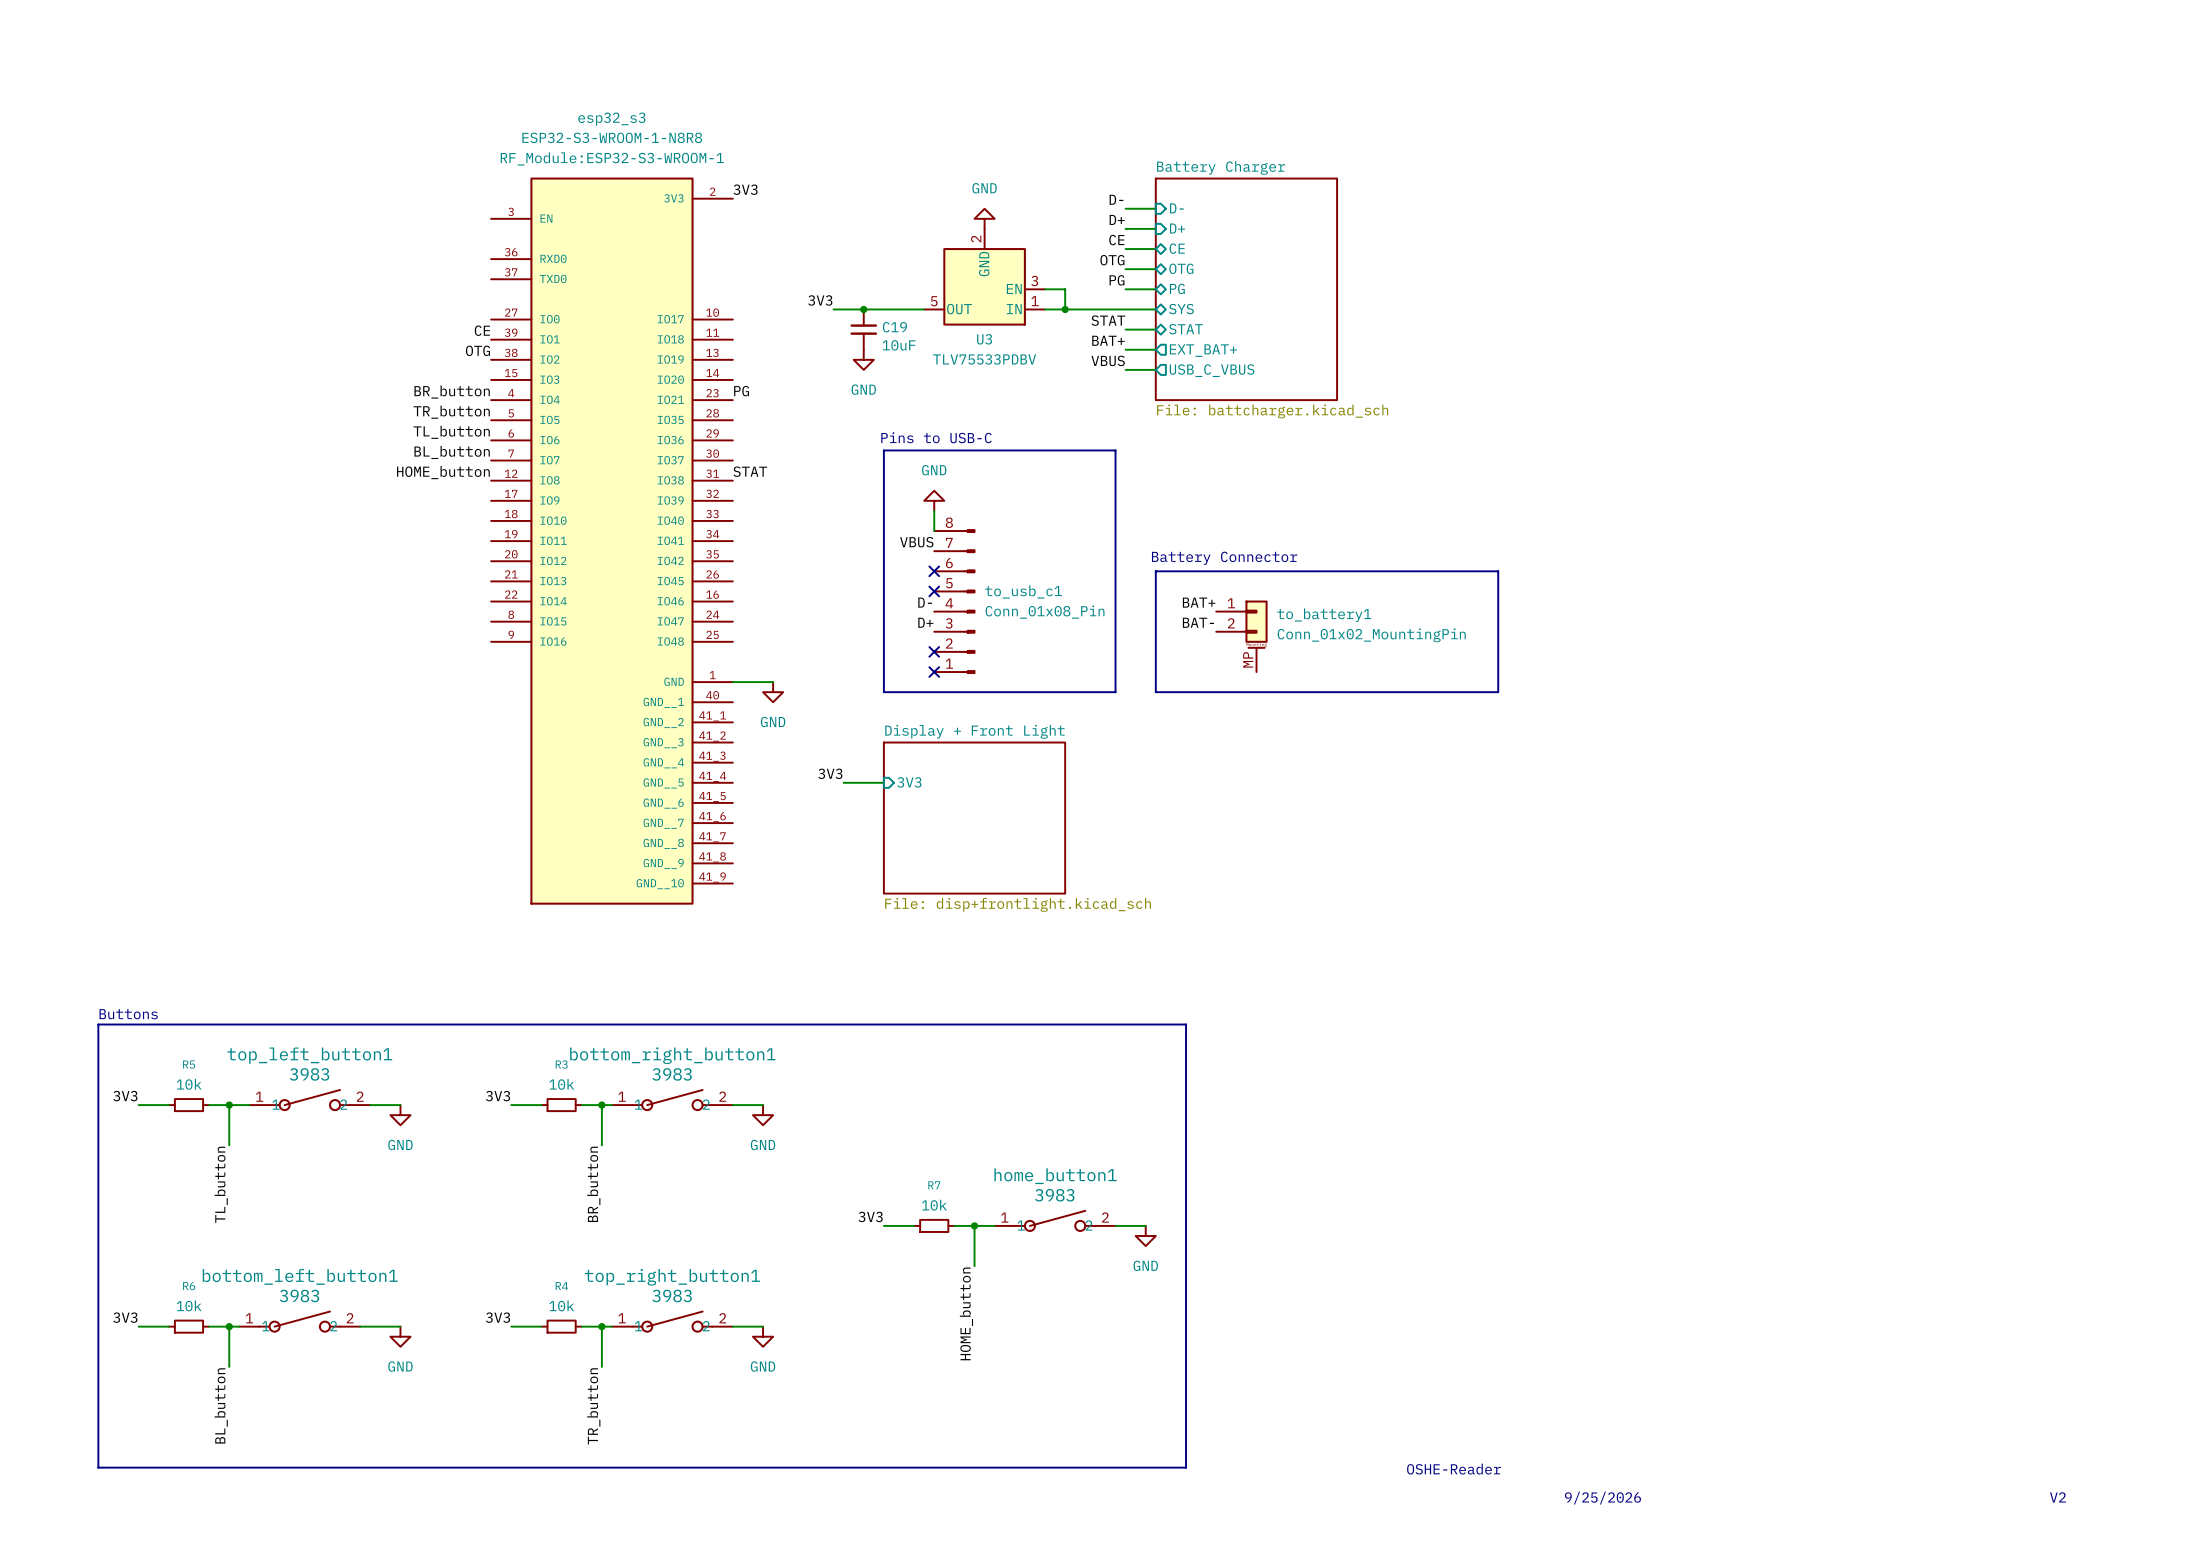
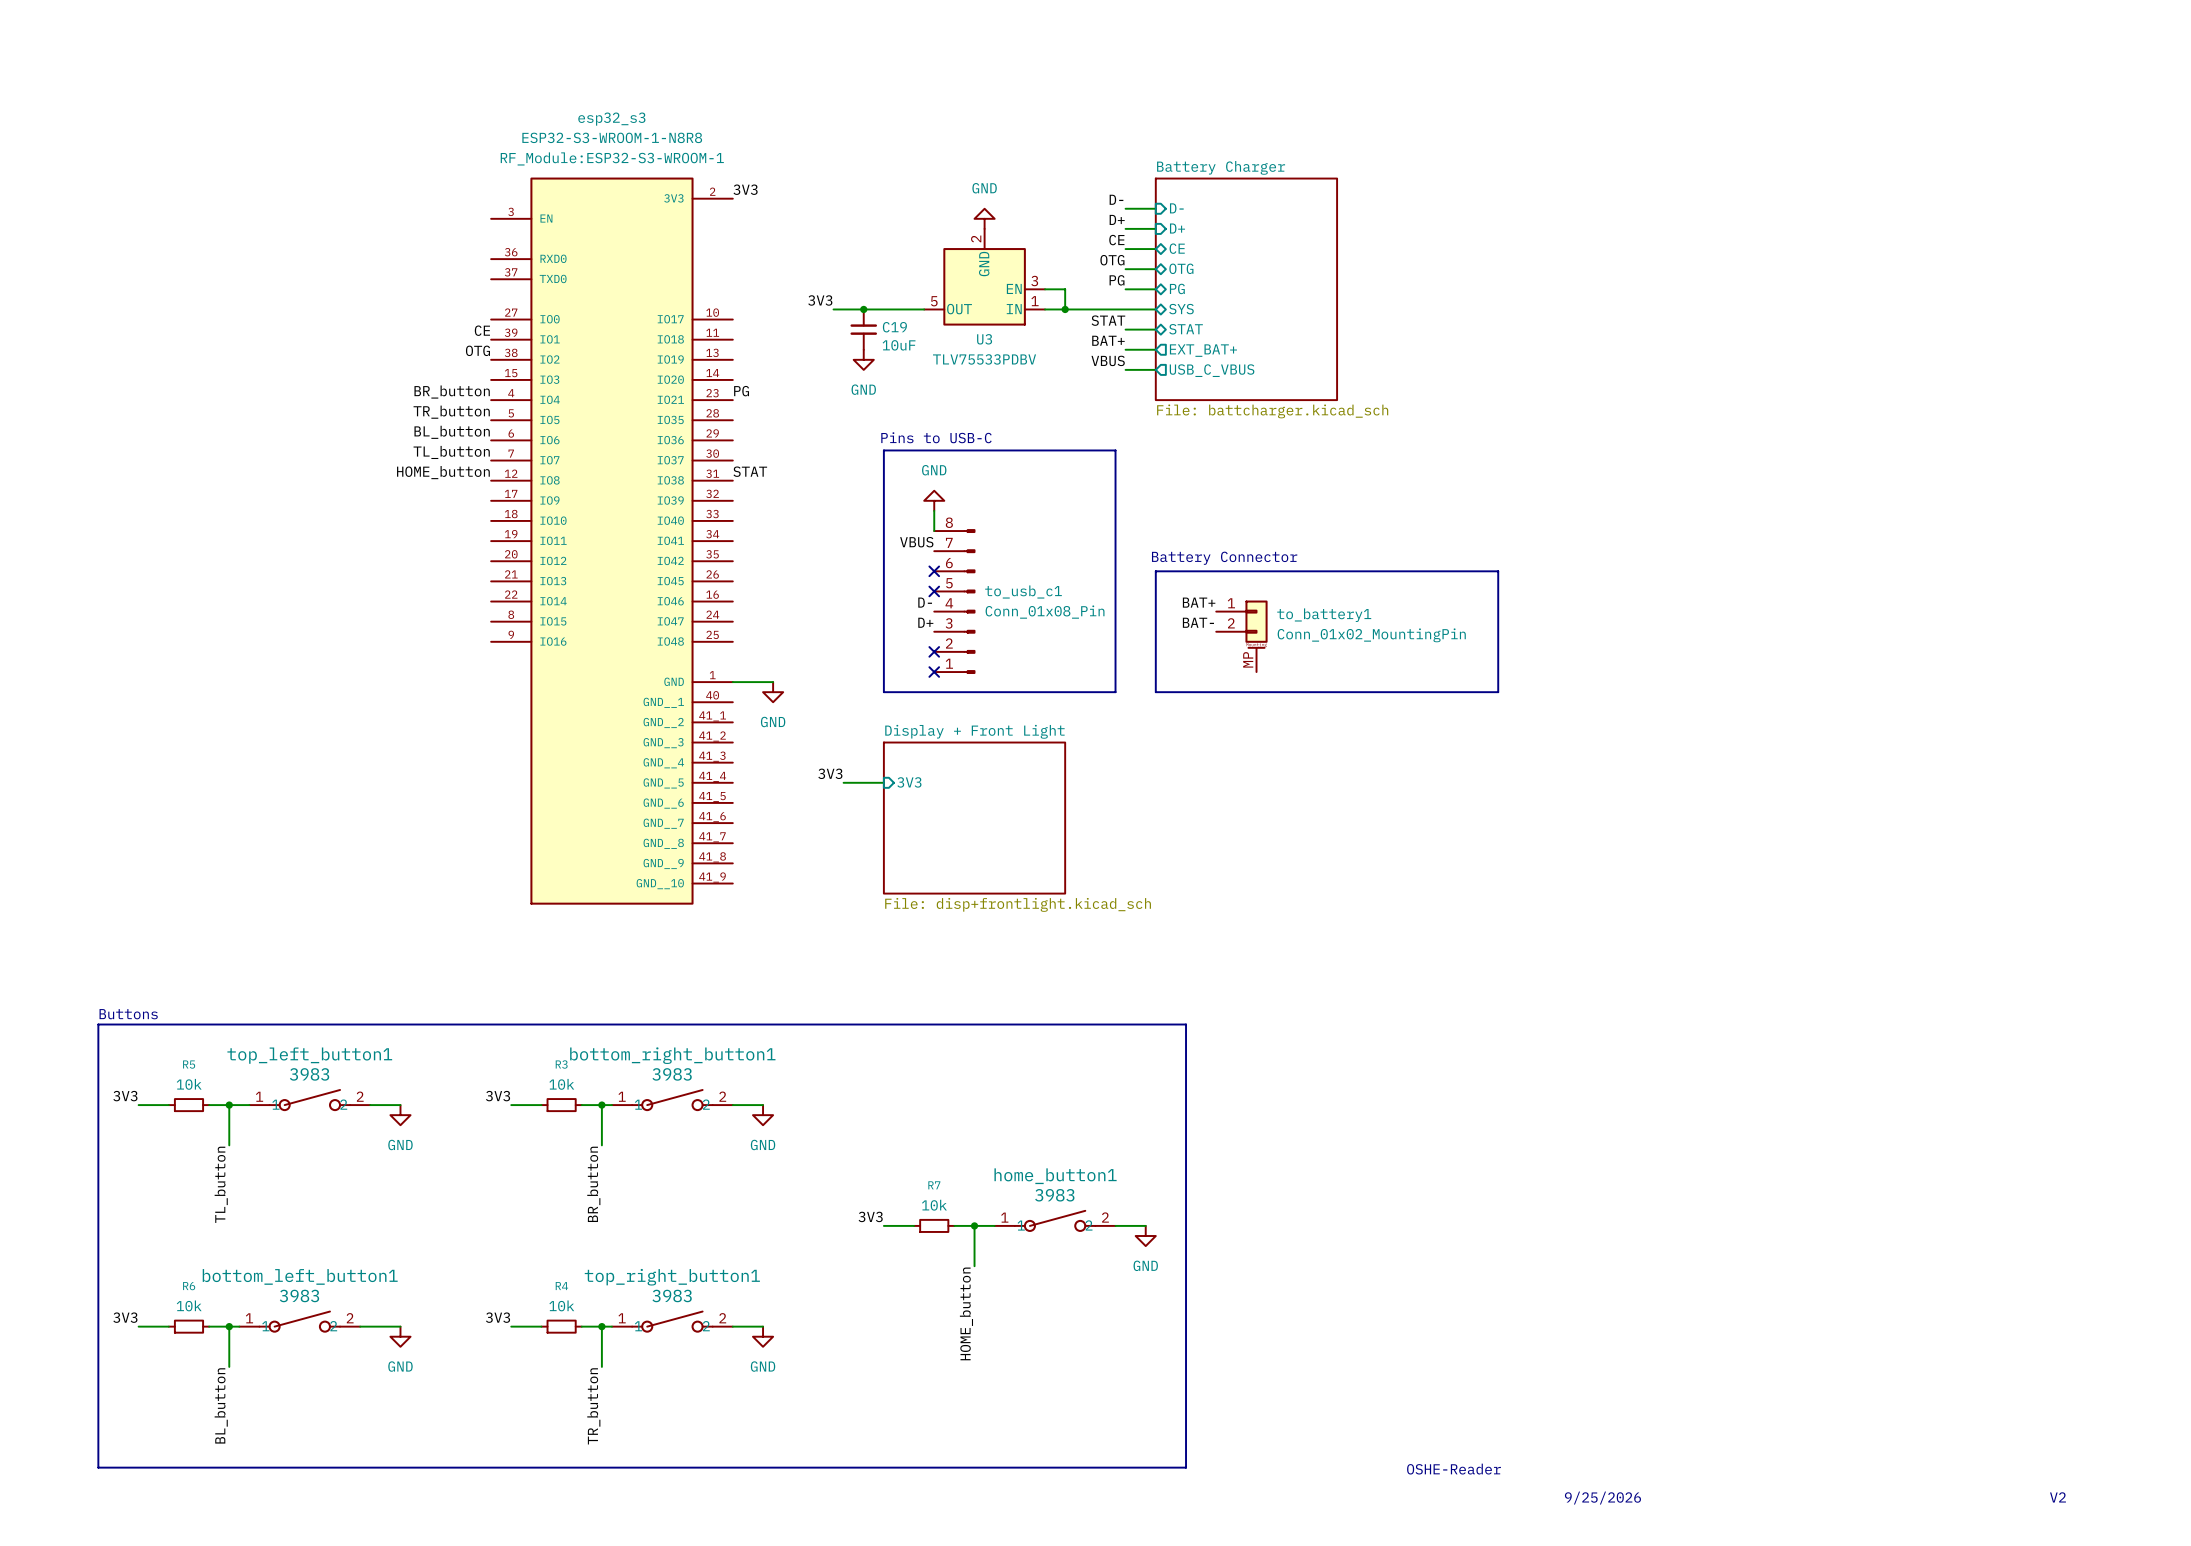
label: TL_button (451, 432) -> BL_button (452, 432)
label: BL_button (452, 452) -> TL_button (451, 452)

